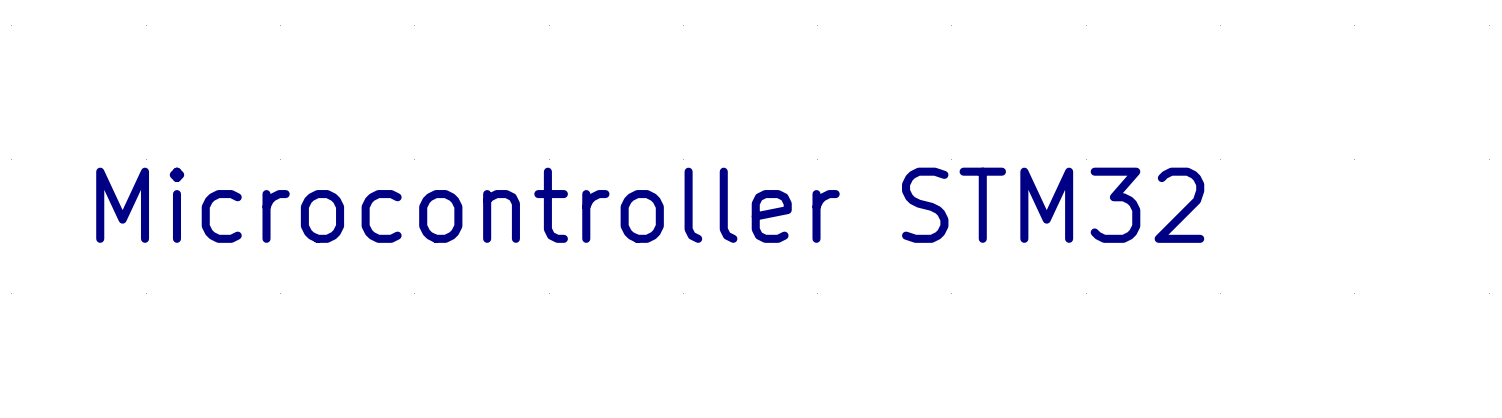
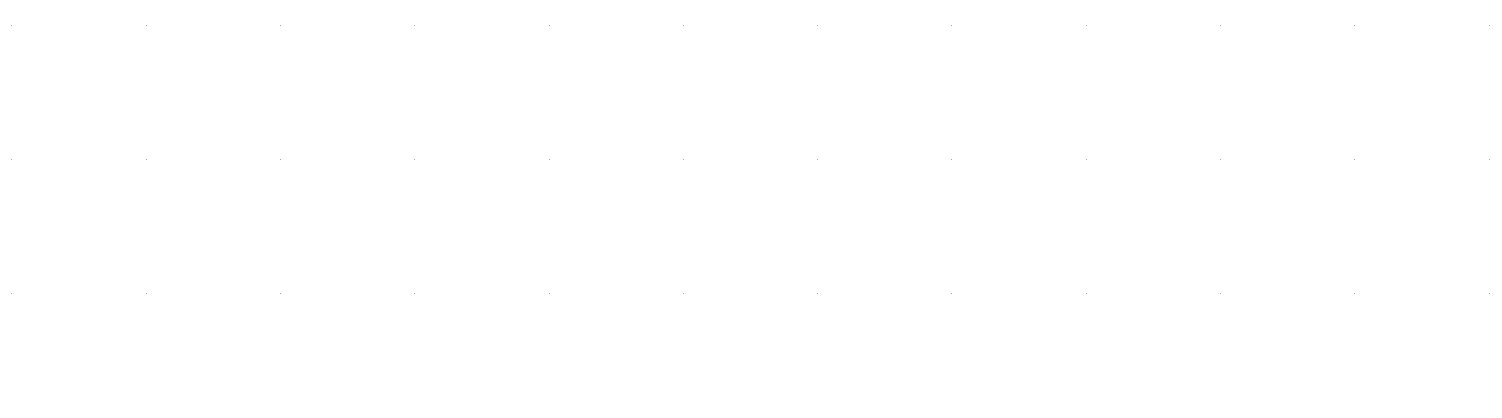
text: Microcontroller STM32 (650, 205) -> none

